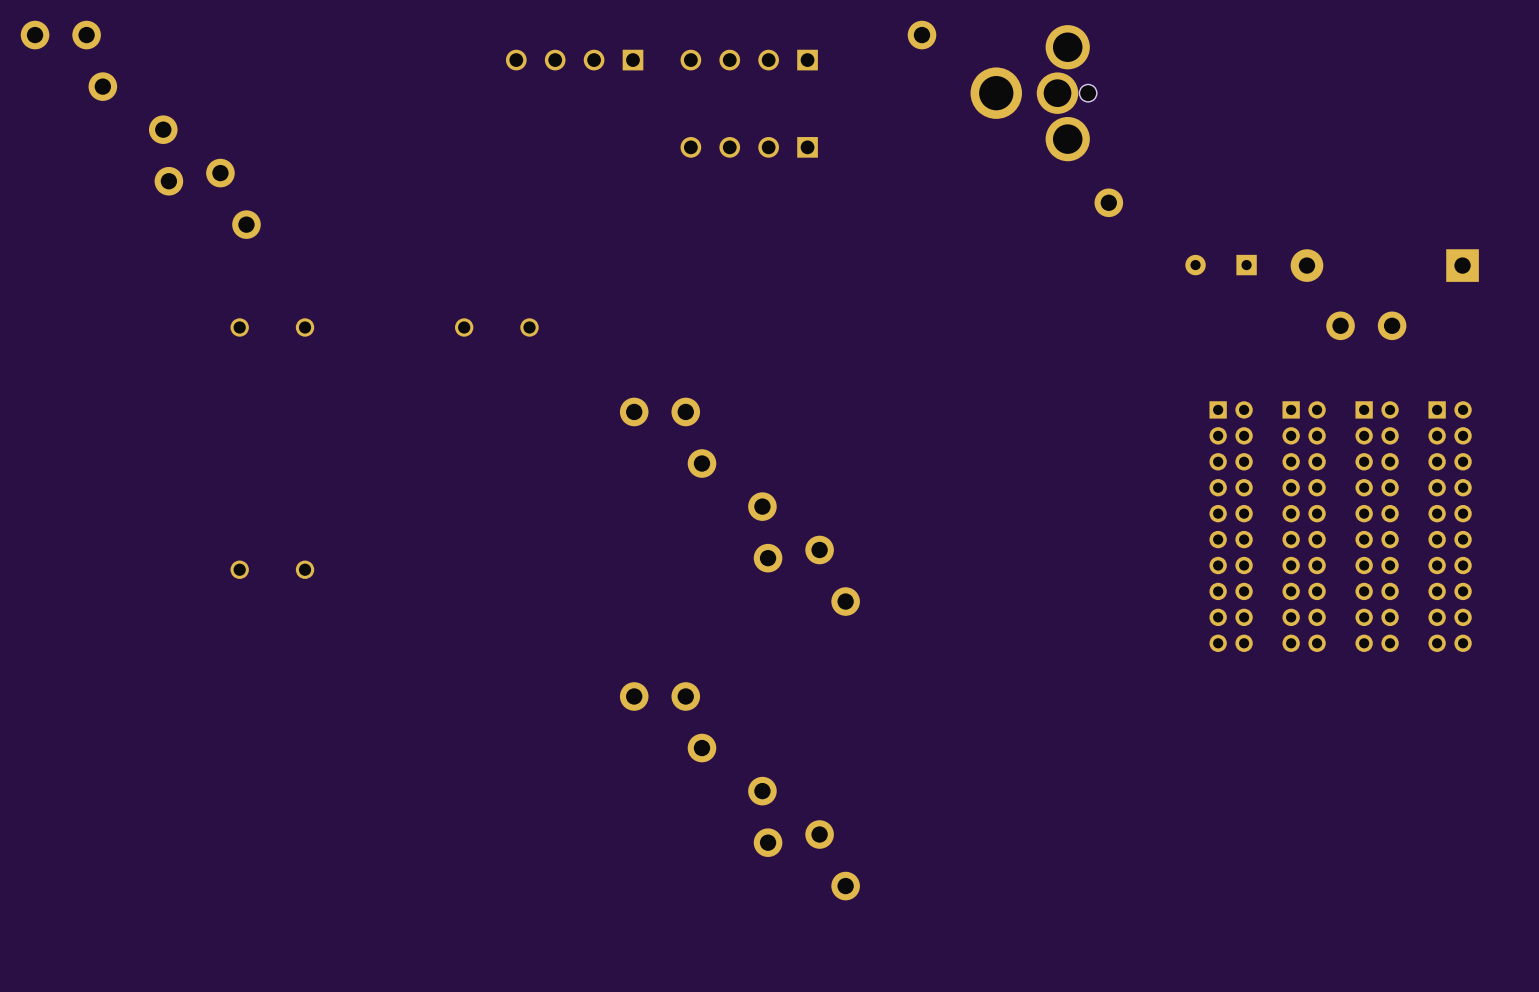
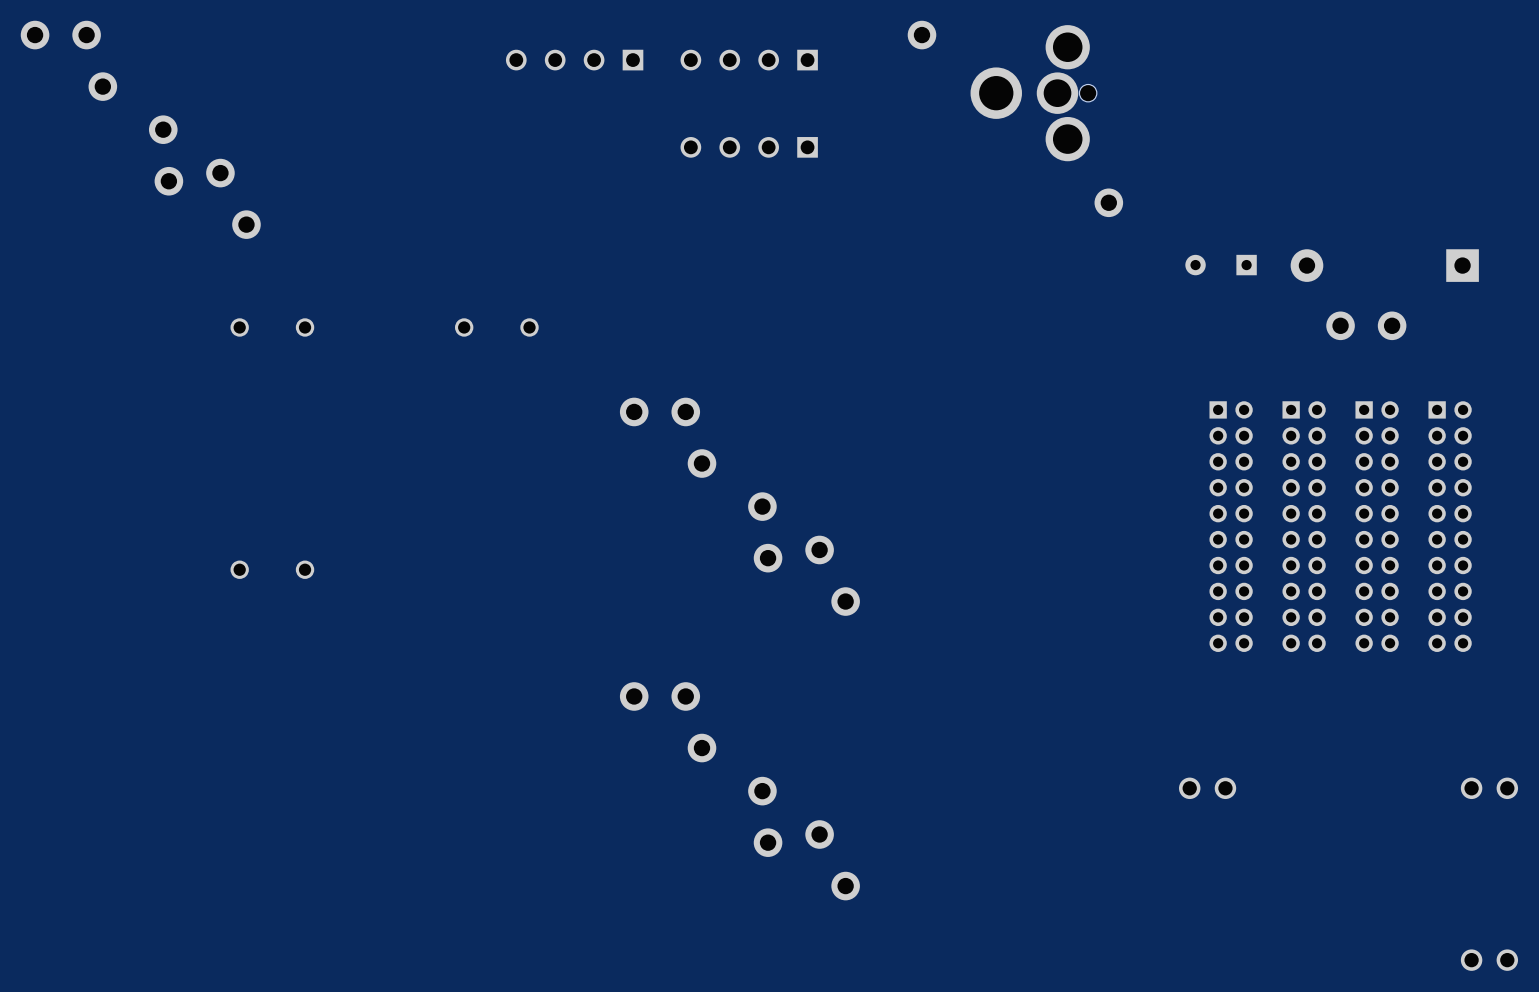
part: none -> (1207, 788)
part: none -> (1489, 788)
part: none -> (1489, 960)

